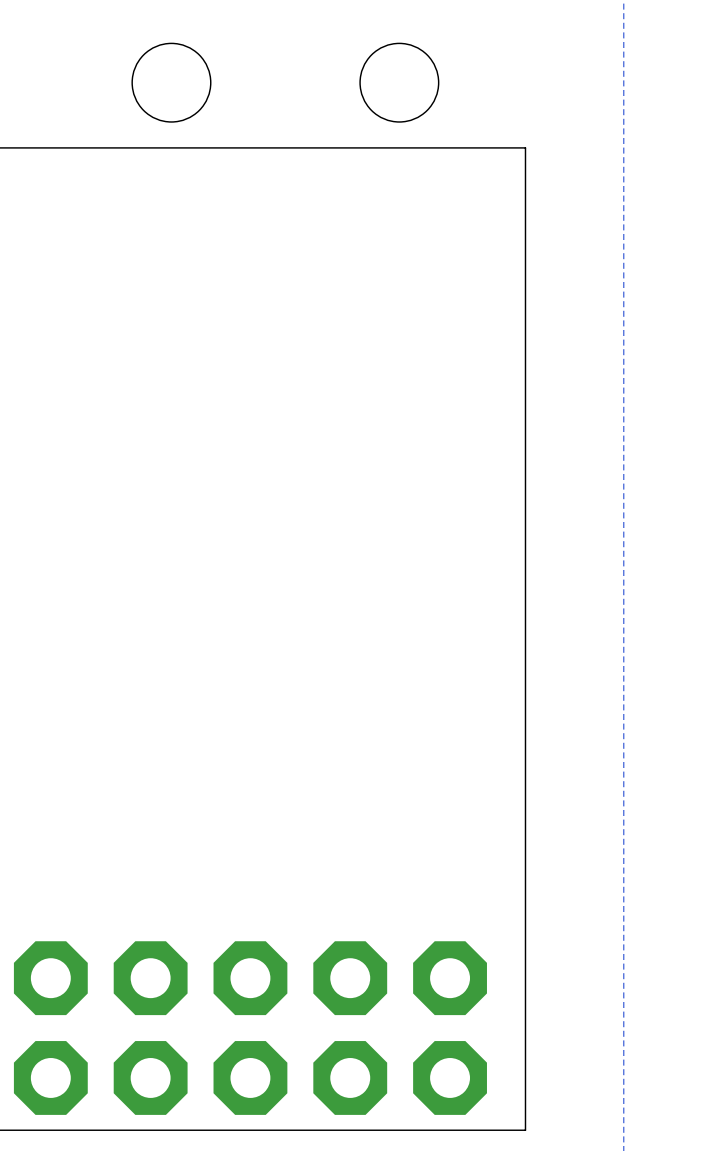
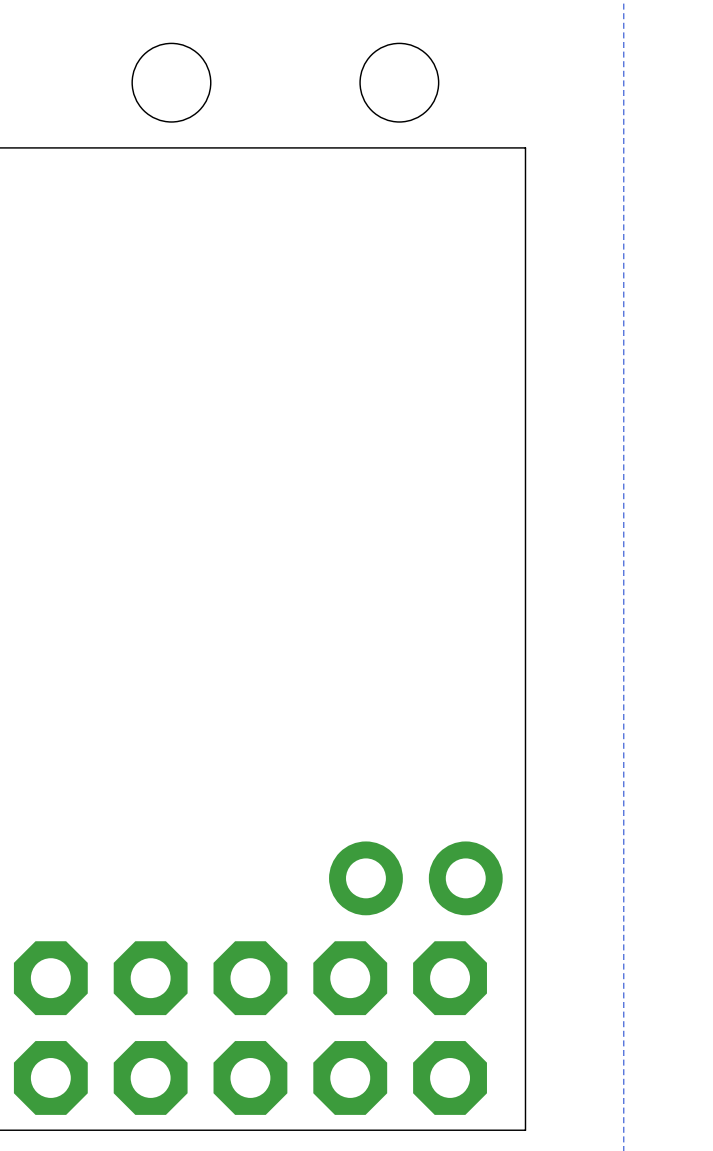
part: none -> (415, 878)

